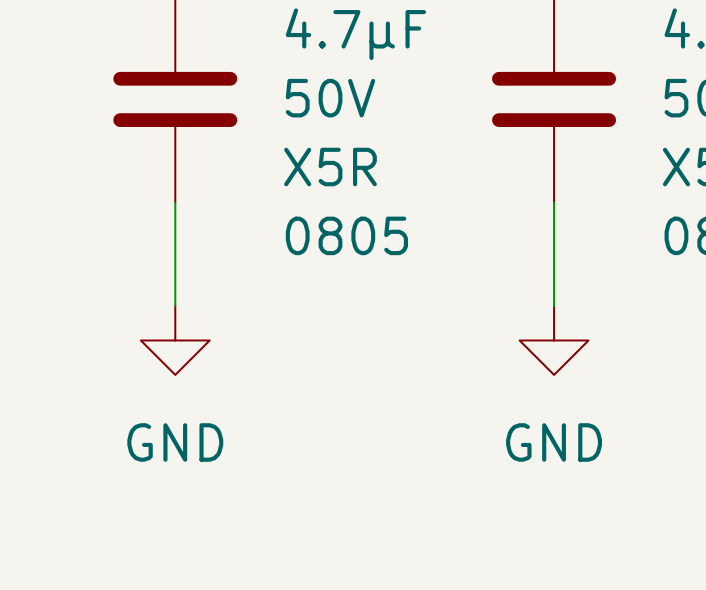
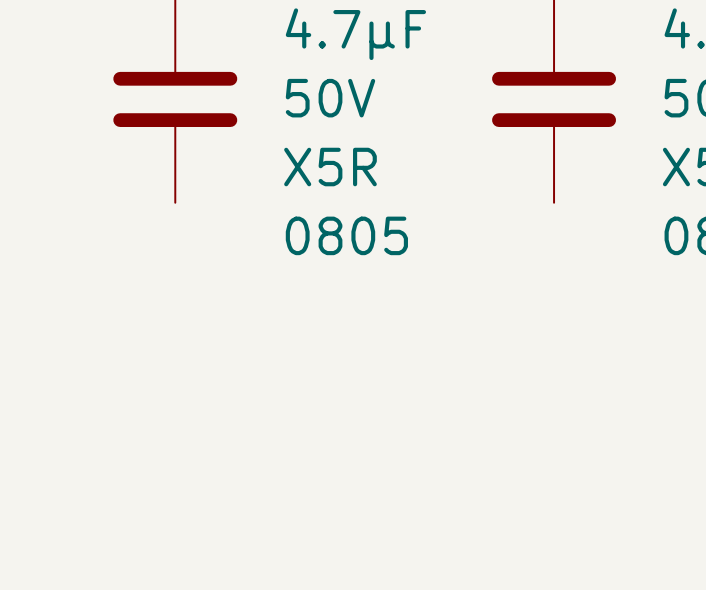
wire: (175, 202) (175, 306) -> none
wire: (554, 202) (554, 306) -> none
power symbol: GND (175, 340) -> none
power symbol: GND (554, 340) -> none

